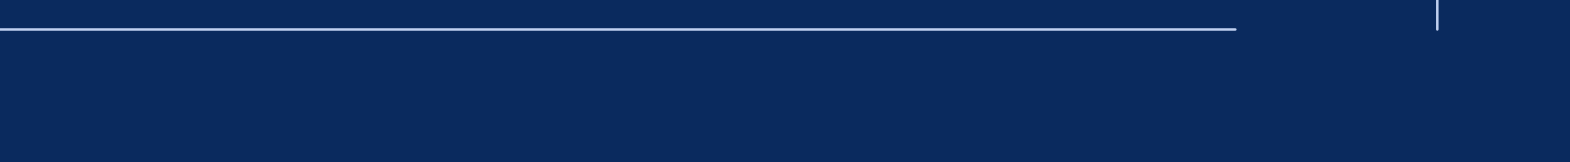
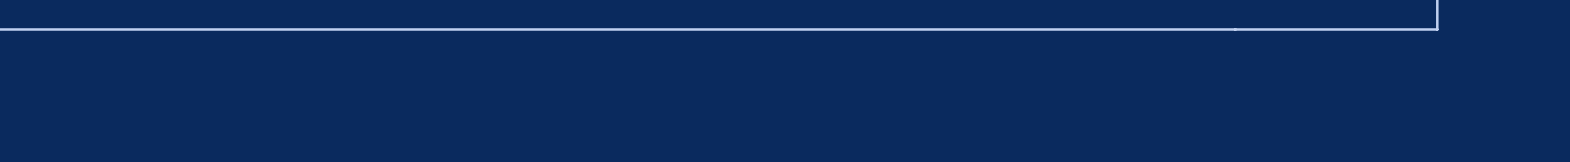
board edge: none -> (1235, 29) (1437, 29)

